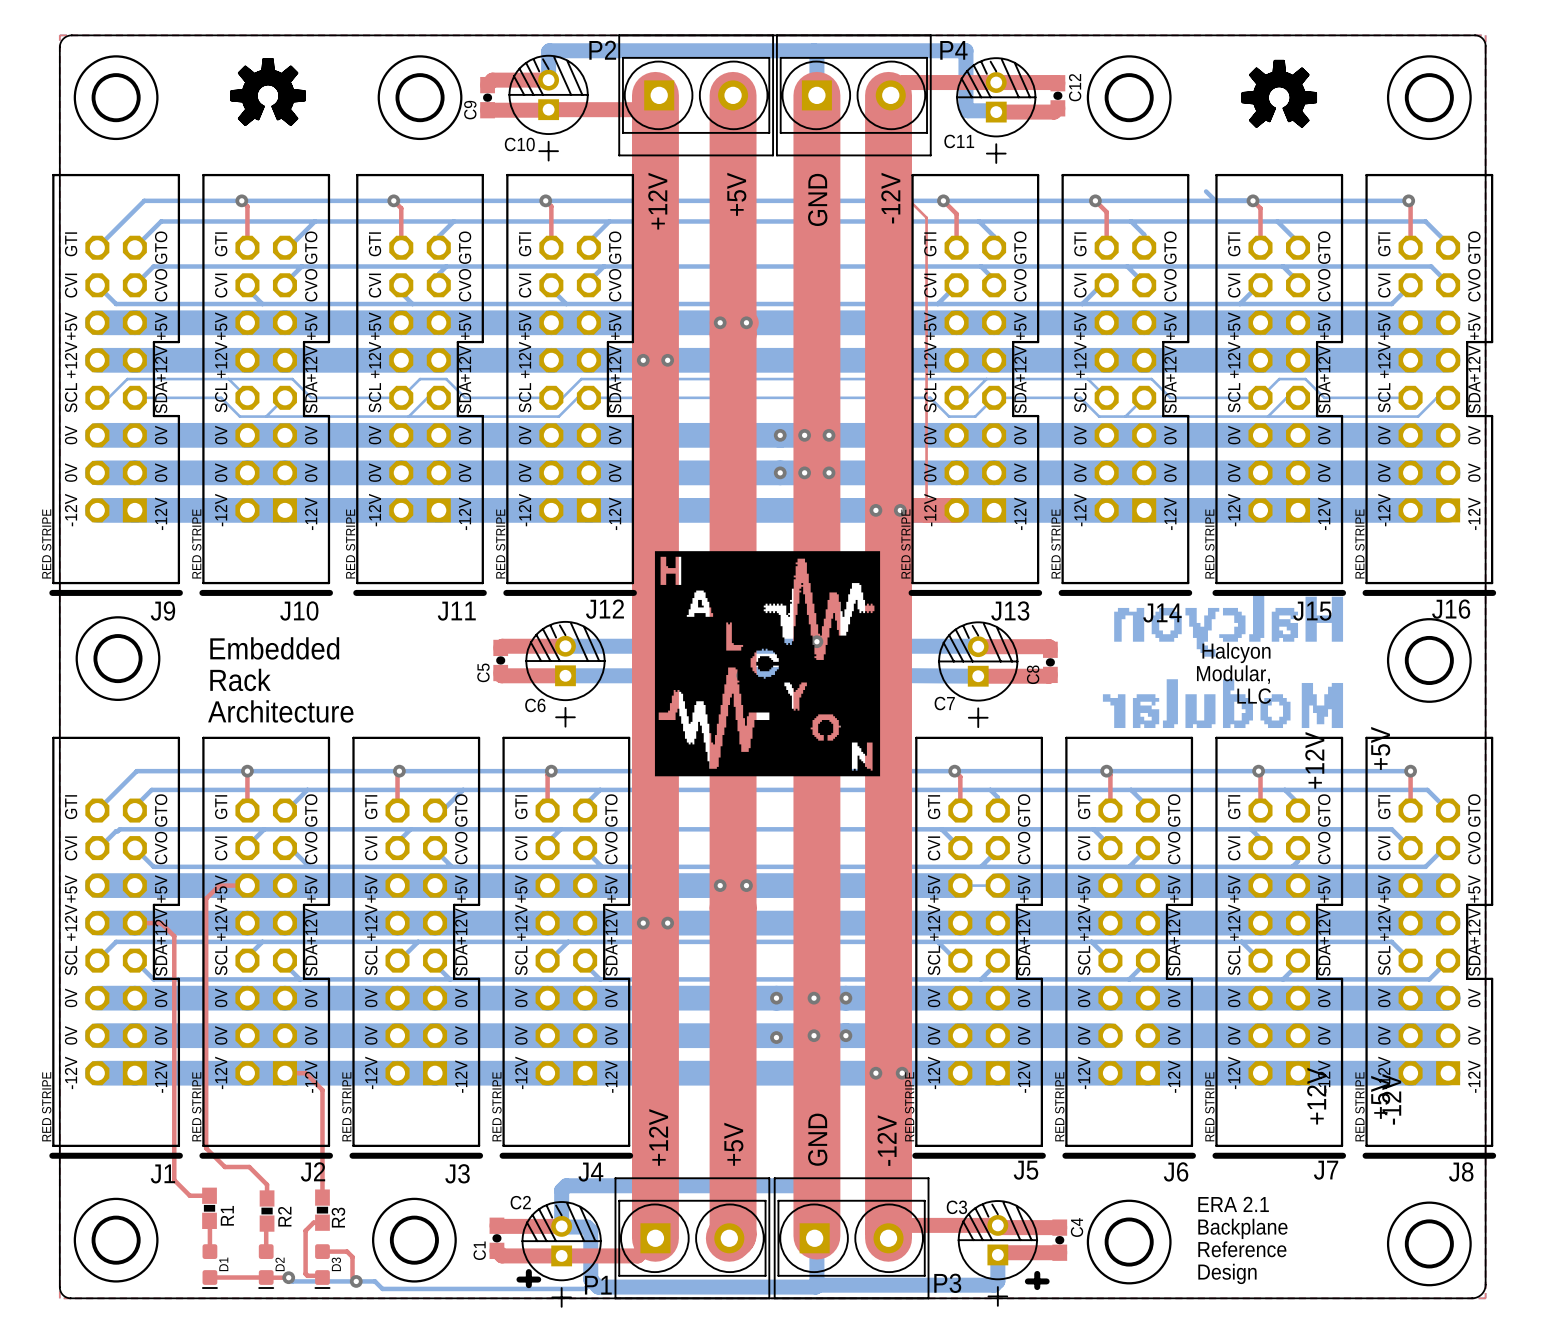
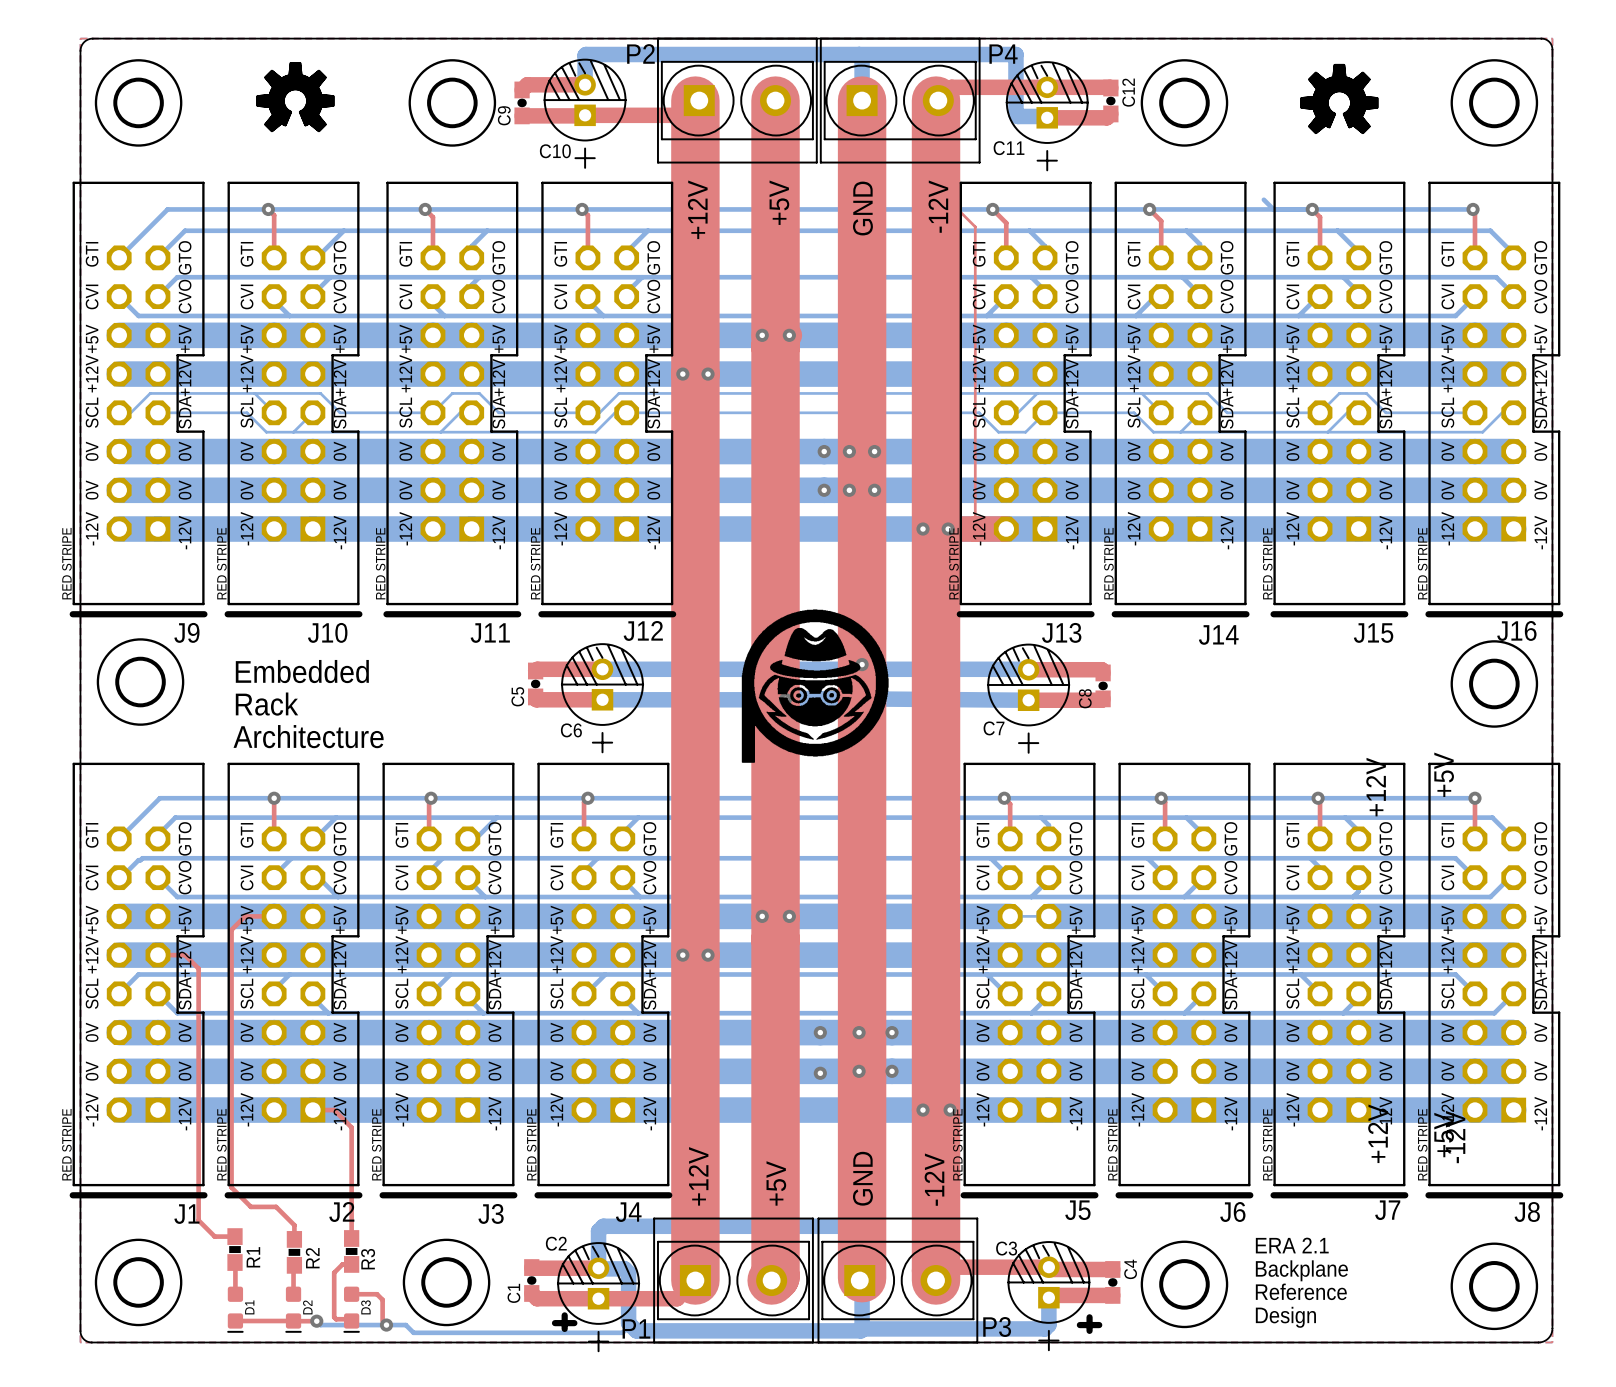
drawing shape: [654, 551, 881, 777] -> [741, 609, 889, 763]
drawing: [1102, 592, 1344, 729] -> none
text: Halcyon (1236, 652) -> none
text: Modular, (1233, 674) -> none
text: LLC (1254, 696) -> none

